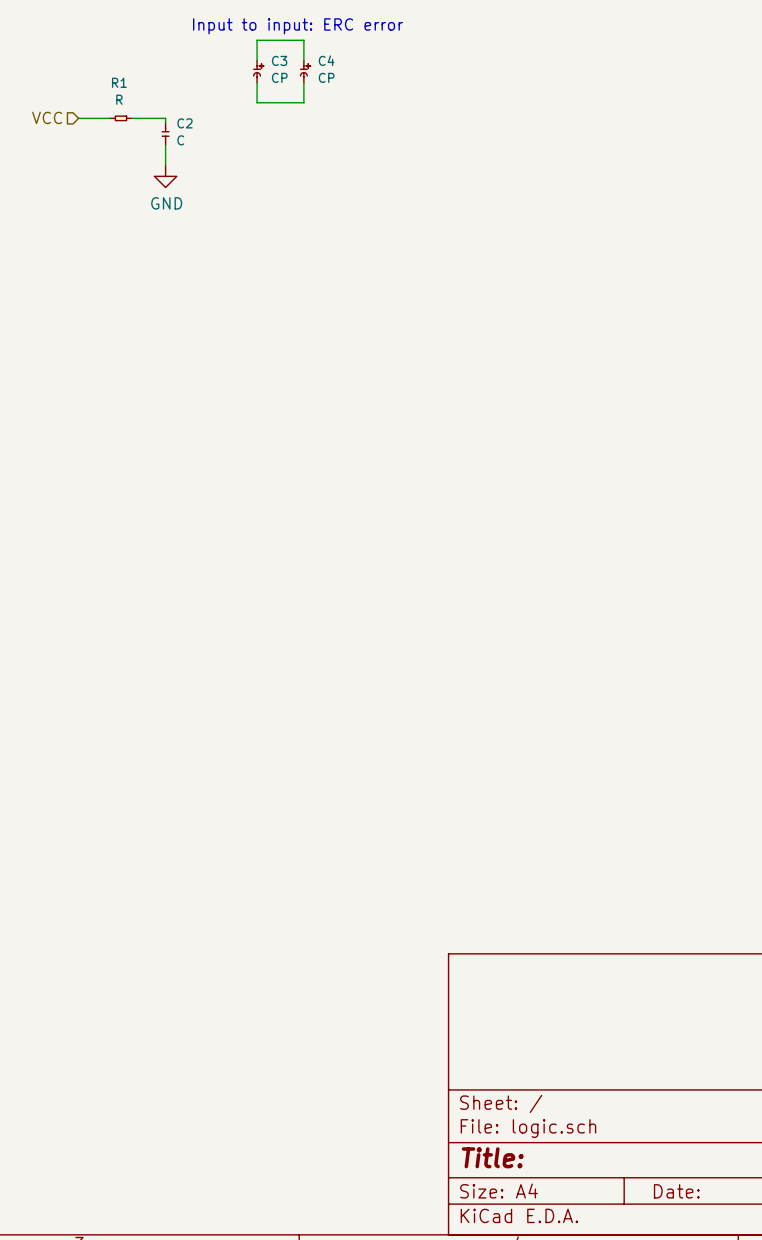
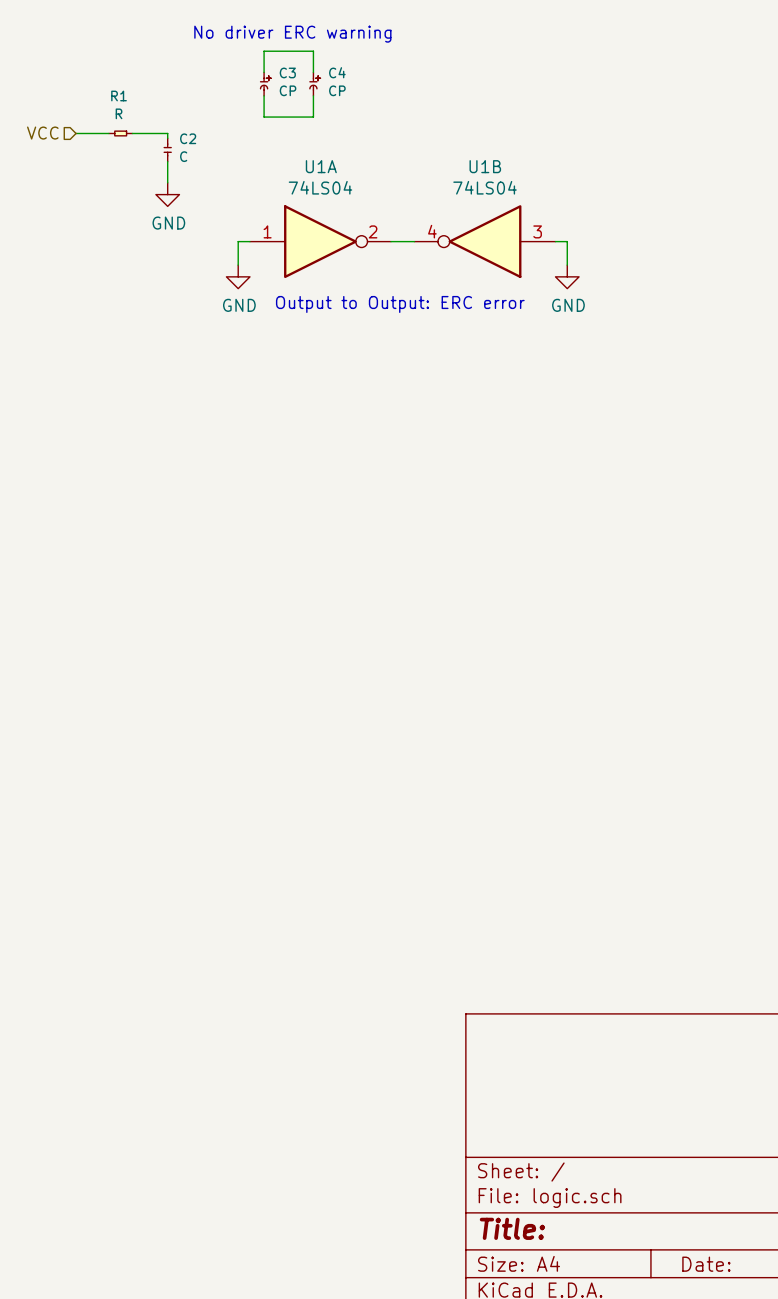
text: Input to input: ERC error (298, 26) -> No driver ERC warning (292, 34)
wire: none -> (249, 241) (238, 241) (238, 265)
U1A: none -> 74LS04 (320, 241)
wire: none -> (390, 241) (414, 241)
U1B: none -> 74LS04 (485, 241)
wire: none -> (555, 241) (567, 241) (567, 265)
power symbol: none -> GND (238, 276)
power symbol: none -> GND (567, 276)
text: none -> Output to Output: ERC error (400, 304)

